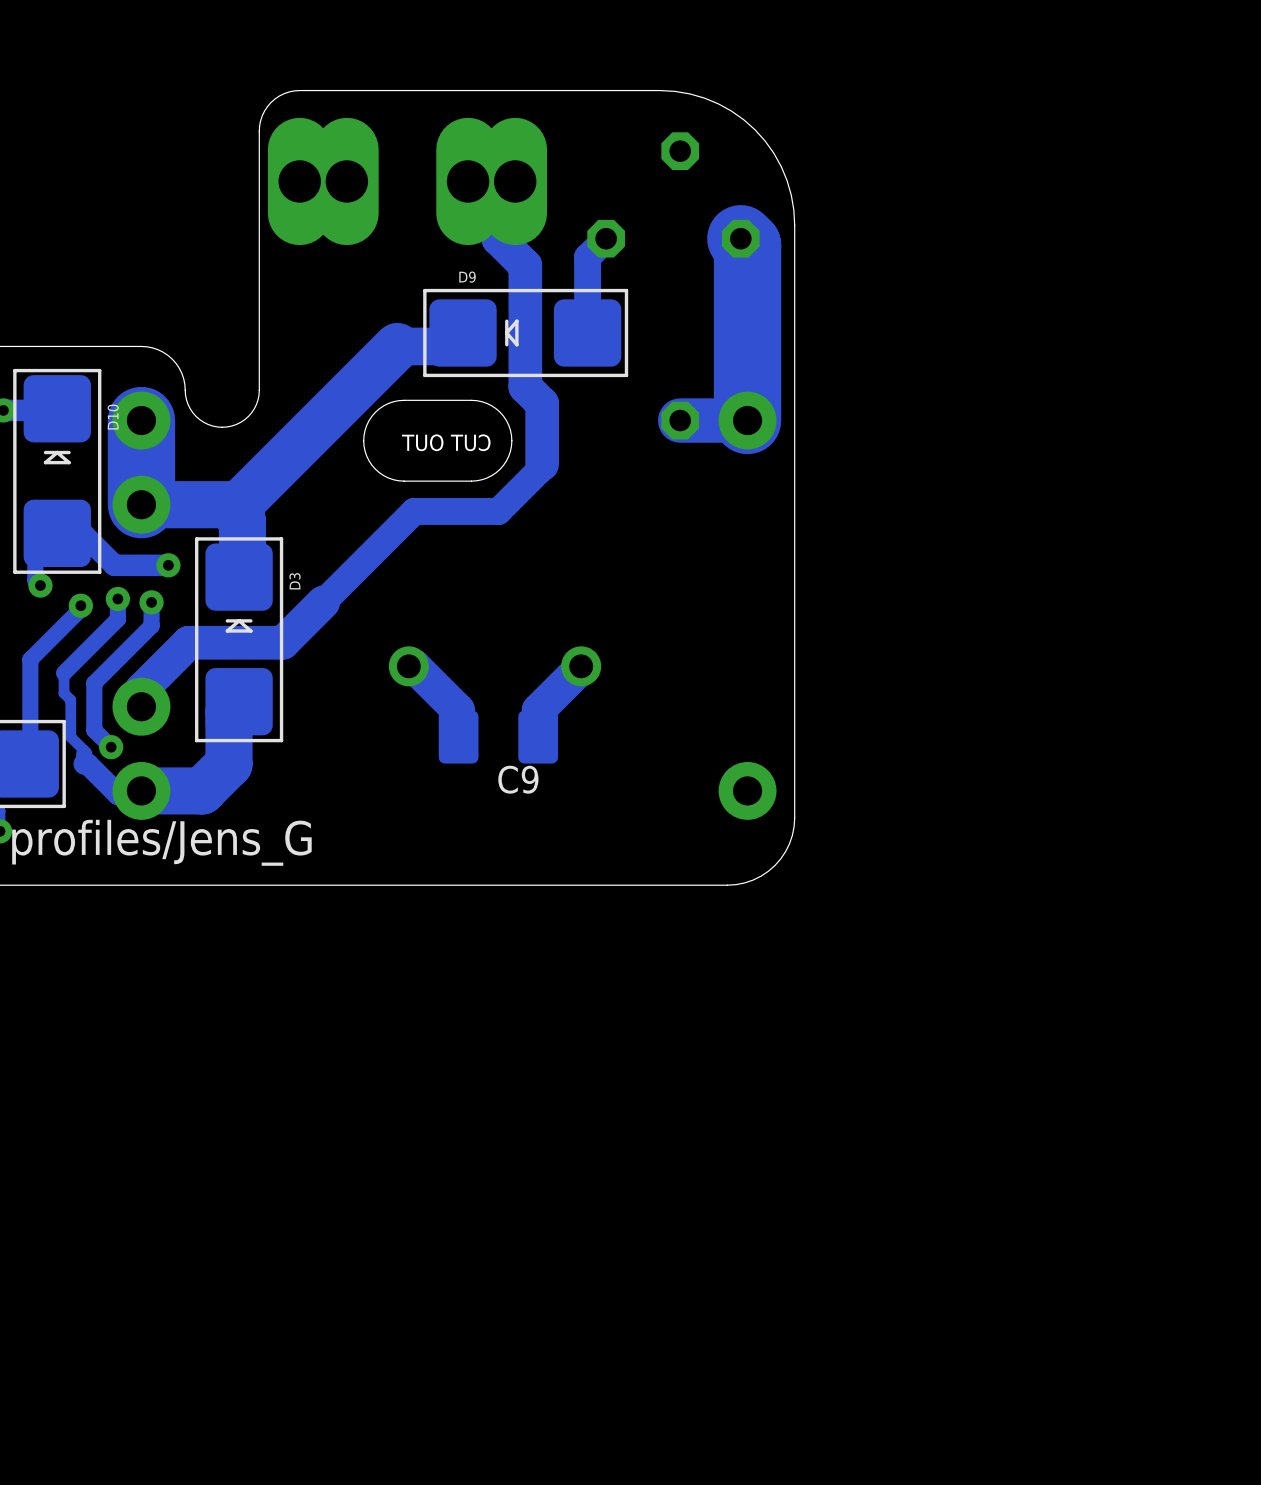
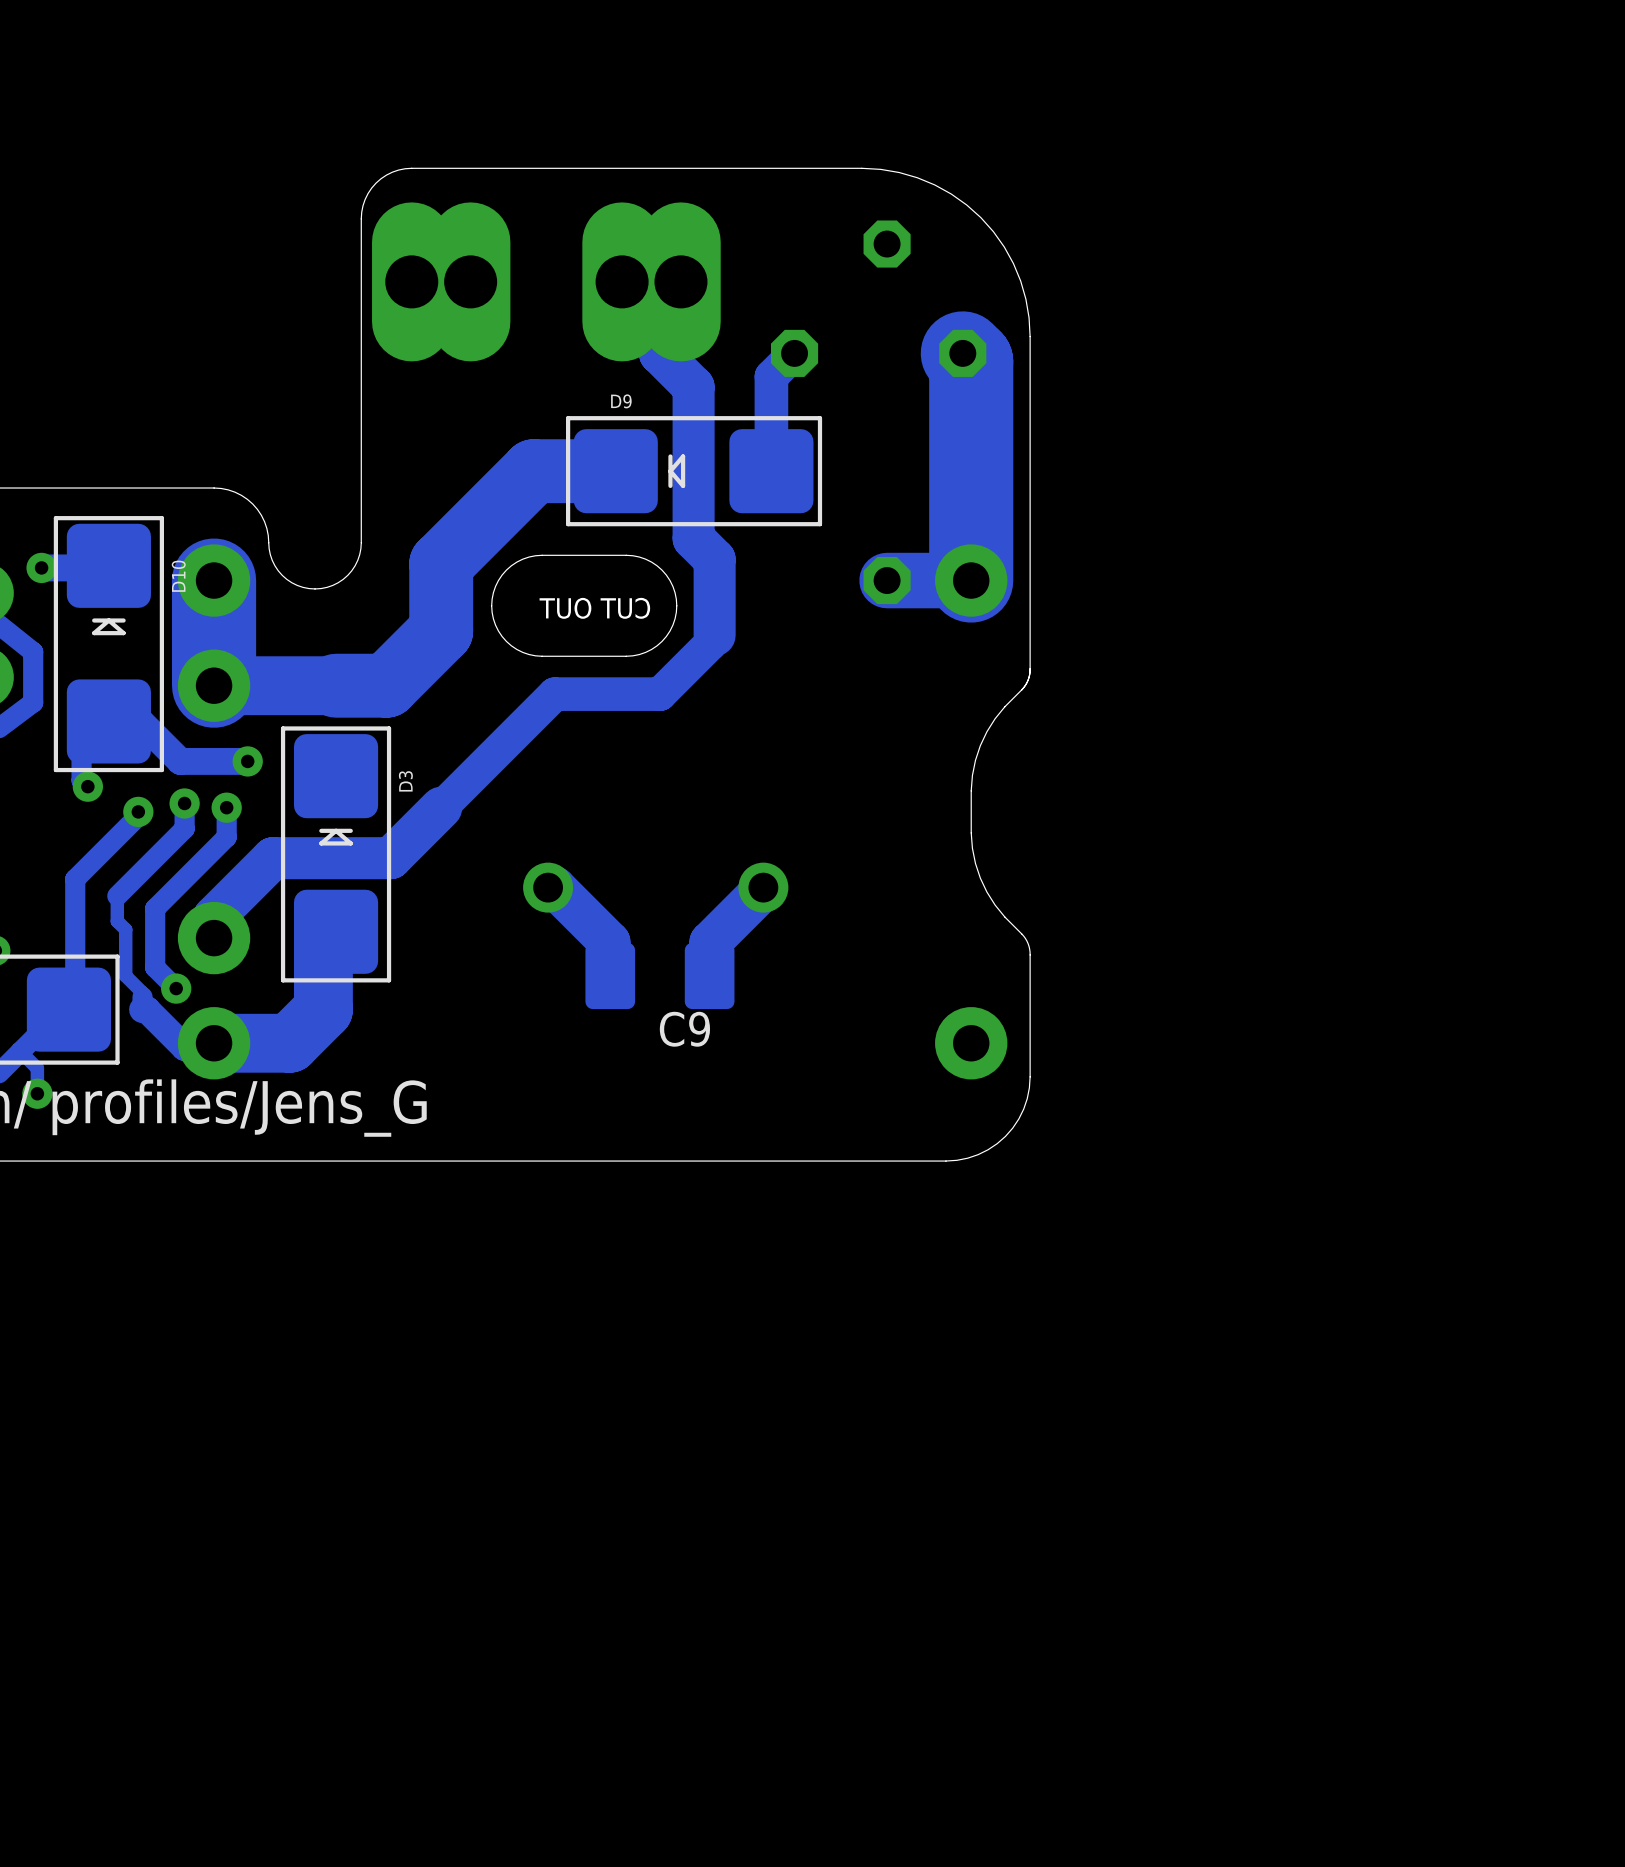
track: (463, 332) (449, 346) (397, 346) (239, 504) (232, 508) (242, 521) (242, 573) (239, 577) -> (615, 471) (533, 471) (441, 563) (441, 631) (386, 685) (336, 685)
board edge: (794, 491) (794, 720) -> (1021, 689) (995, 718) (980, 745) (972, 775) (971, 832) (975, 863) (986, 892) (1004, 917) (1025, 938) (1030, 954)
board edge: none -> (1021, 689) (1028, 680) (1030, 668) (1029, 674) (1028, 680) (1025, 685) (1021, 689)

